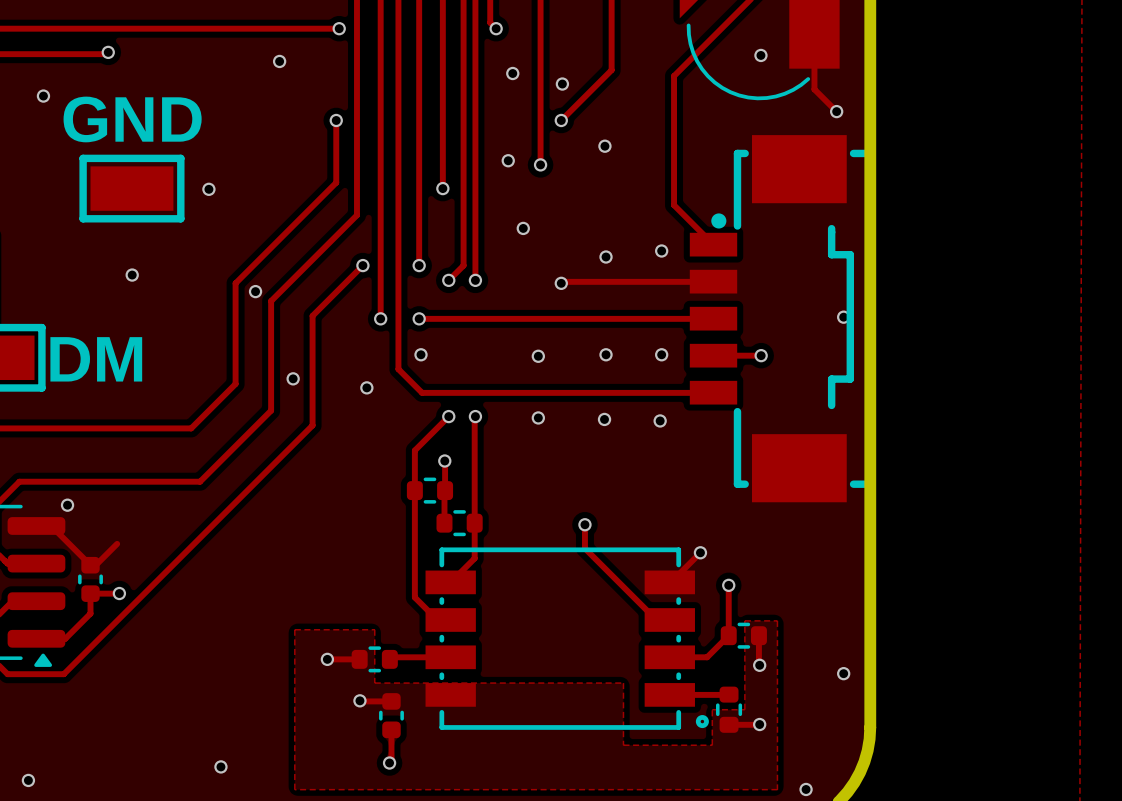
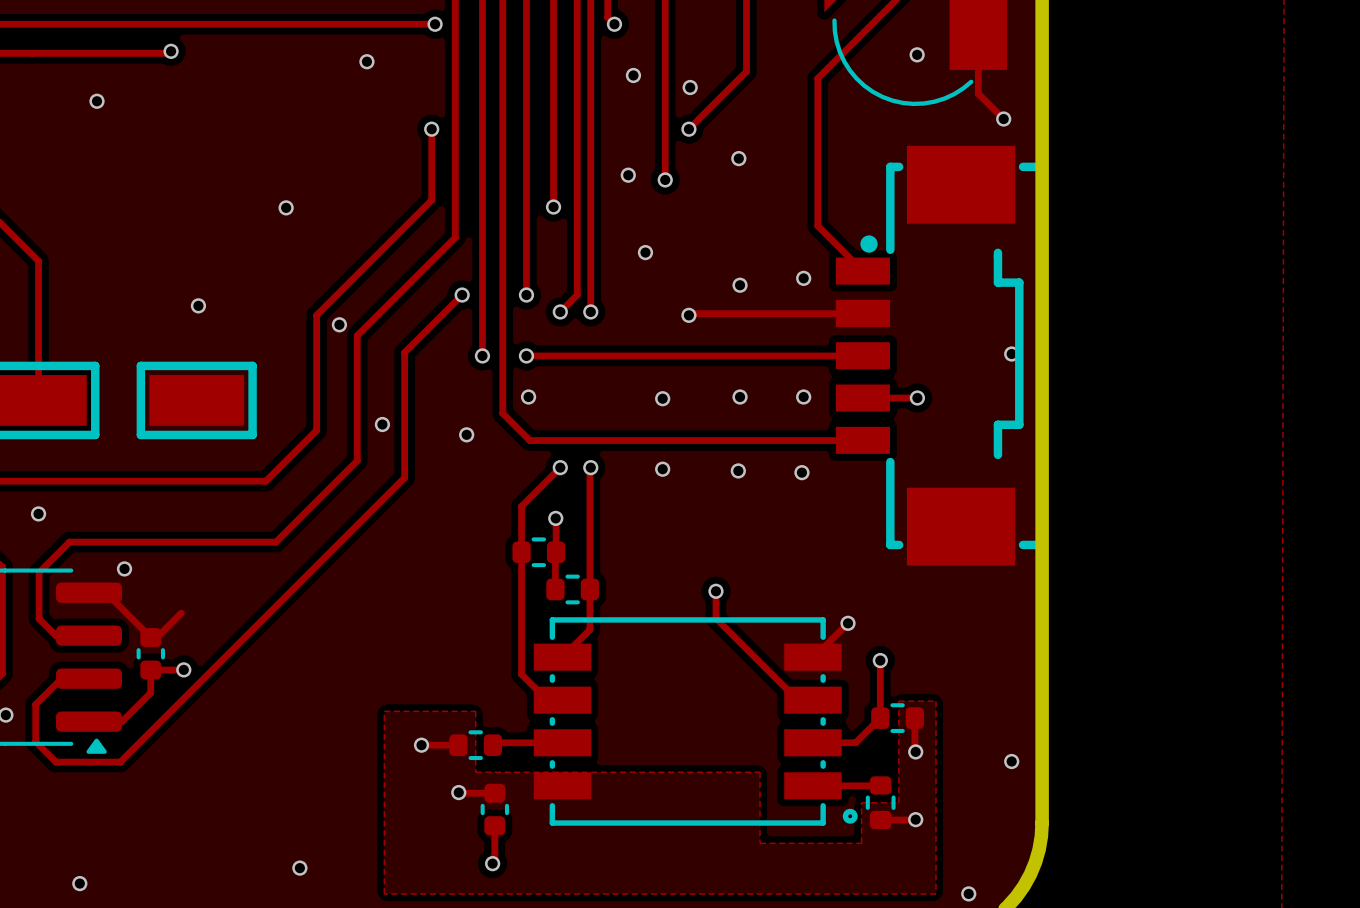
text: GND (132, 119) -> none
part position: (131, 188) -> (196, 400)
text: DM (96, 359) -> none

